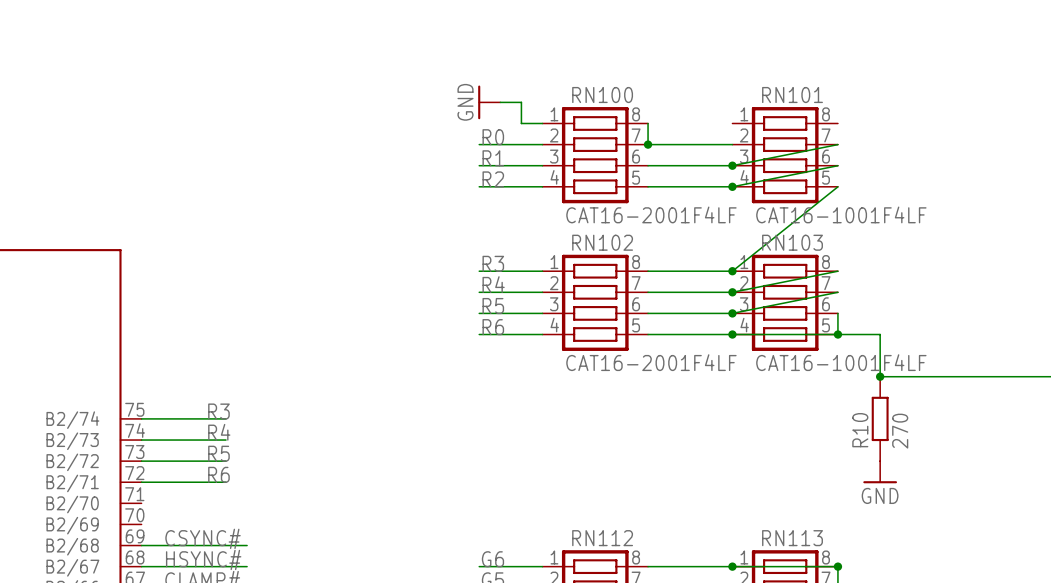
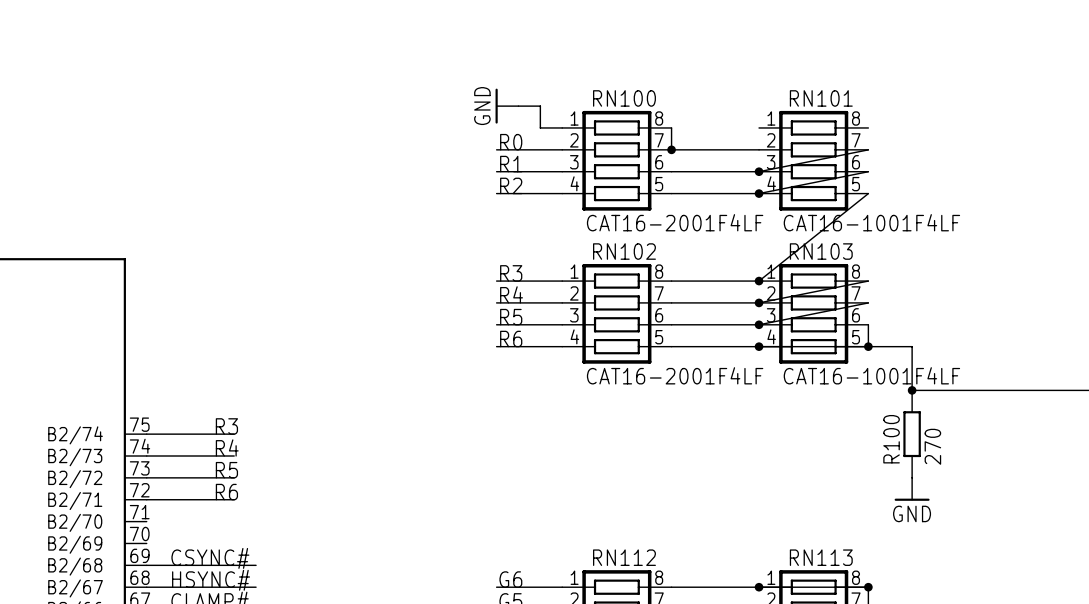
R10 name: R10 (860, 430) -> R100 (891, 439)

